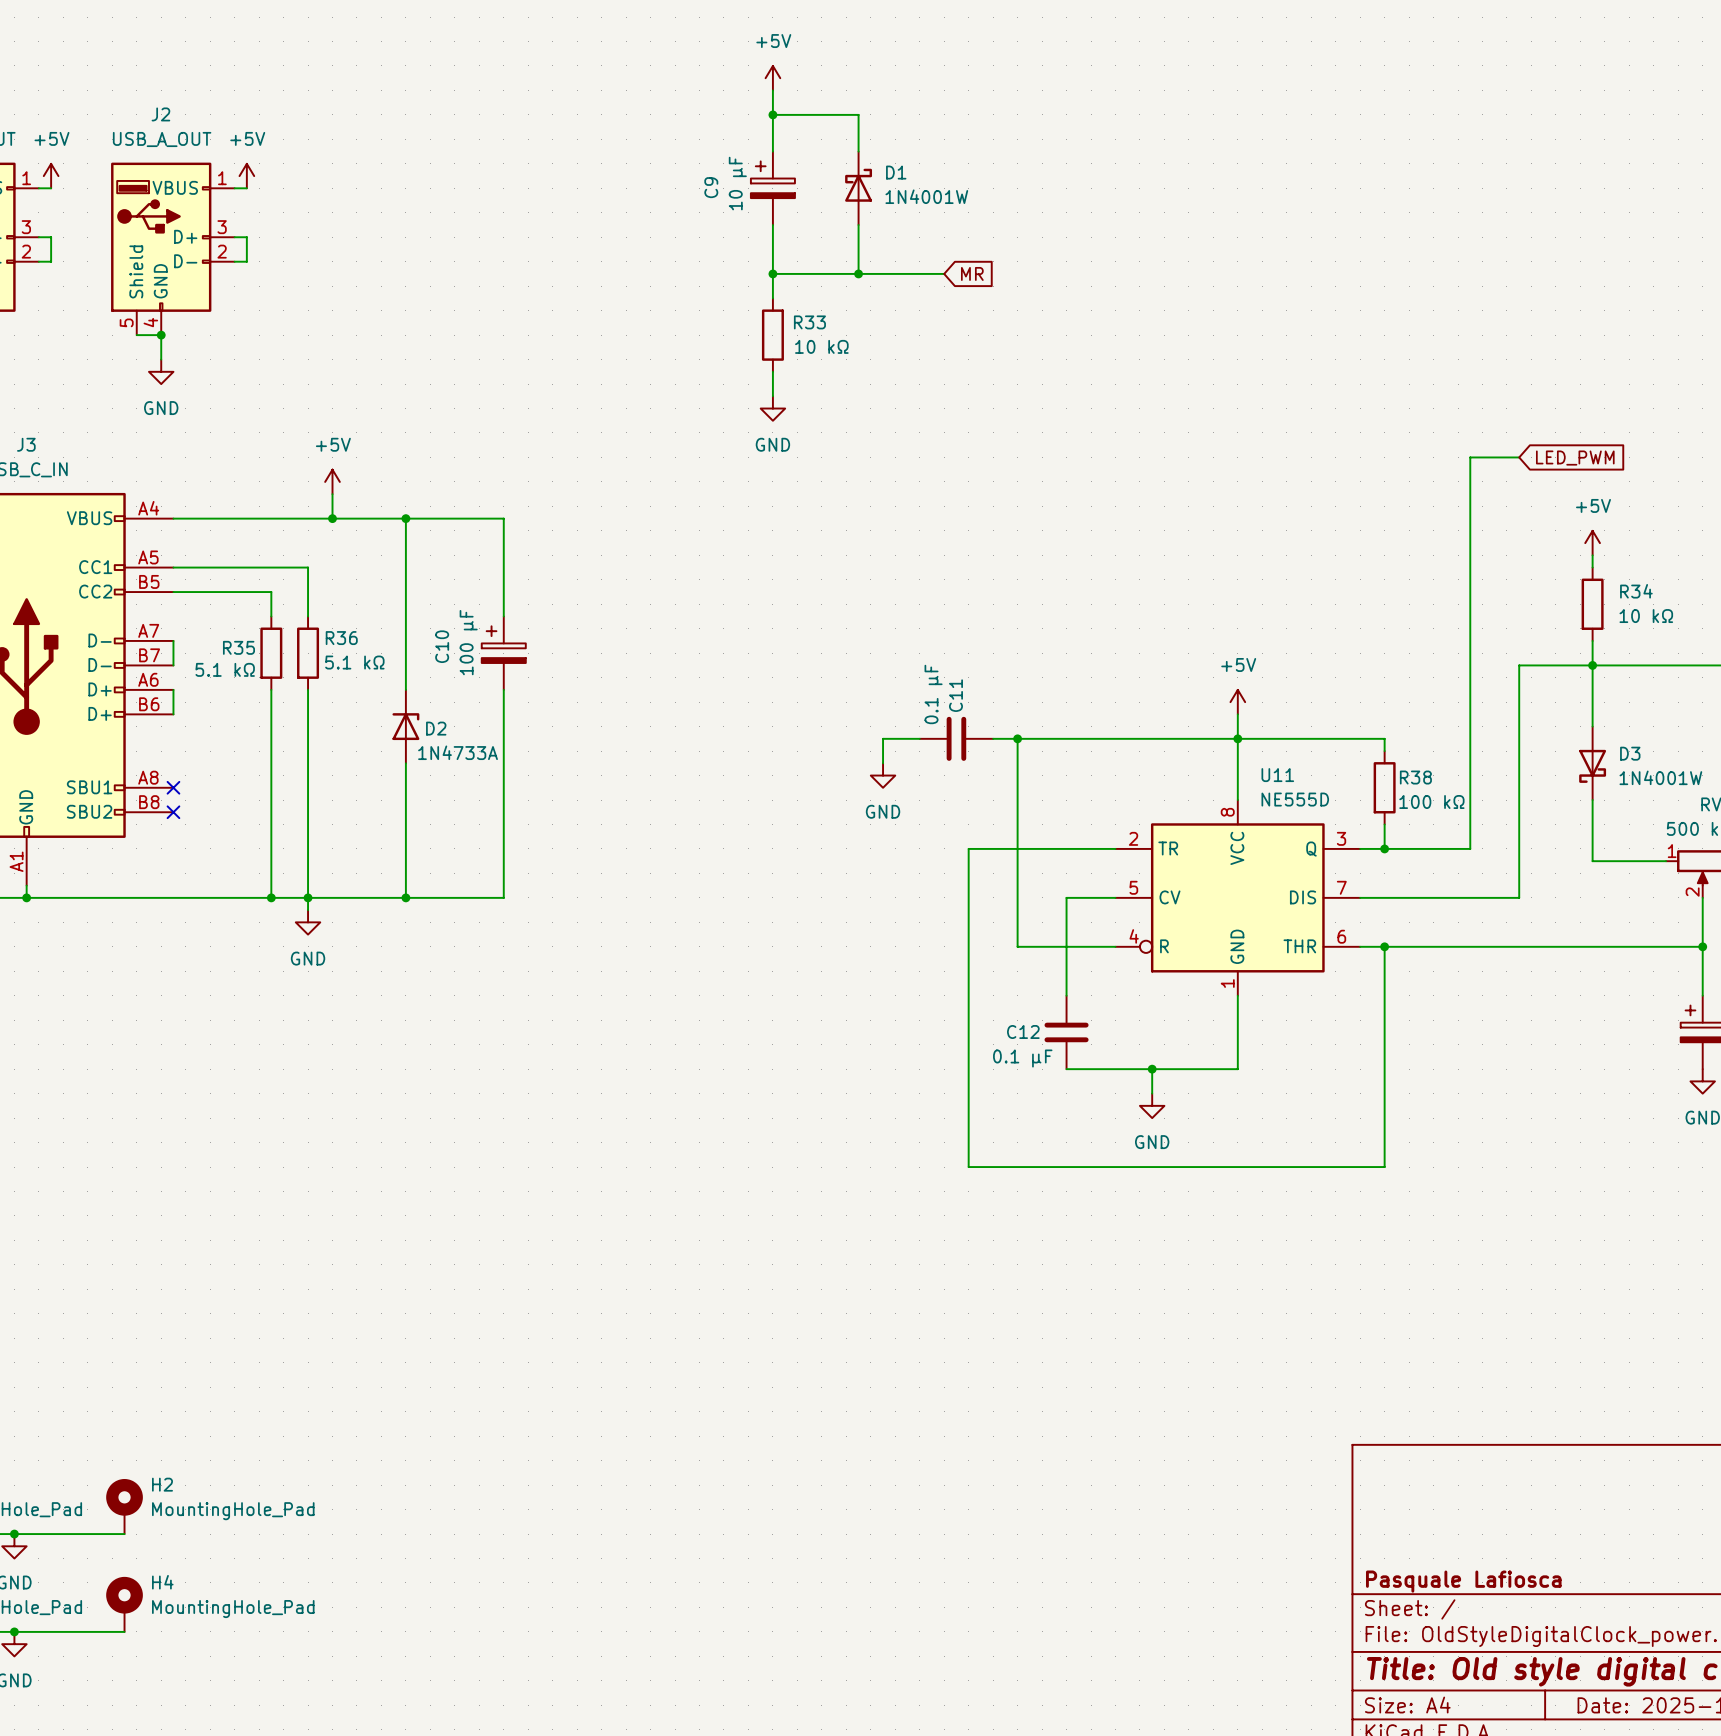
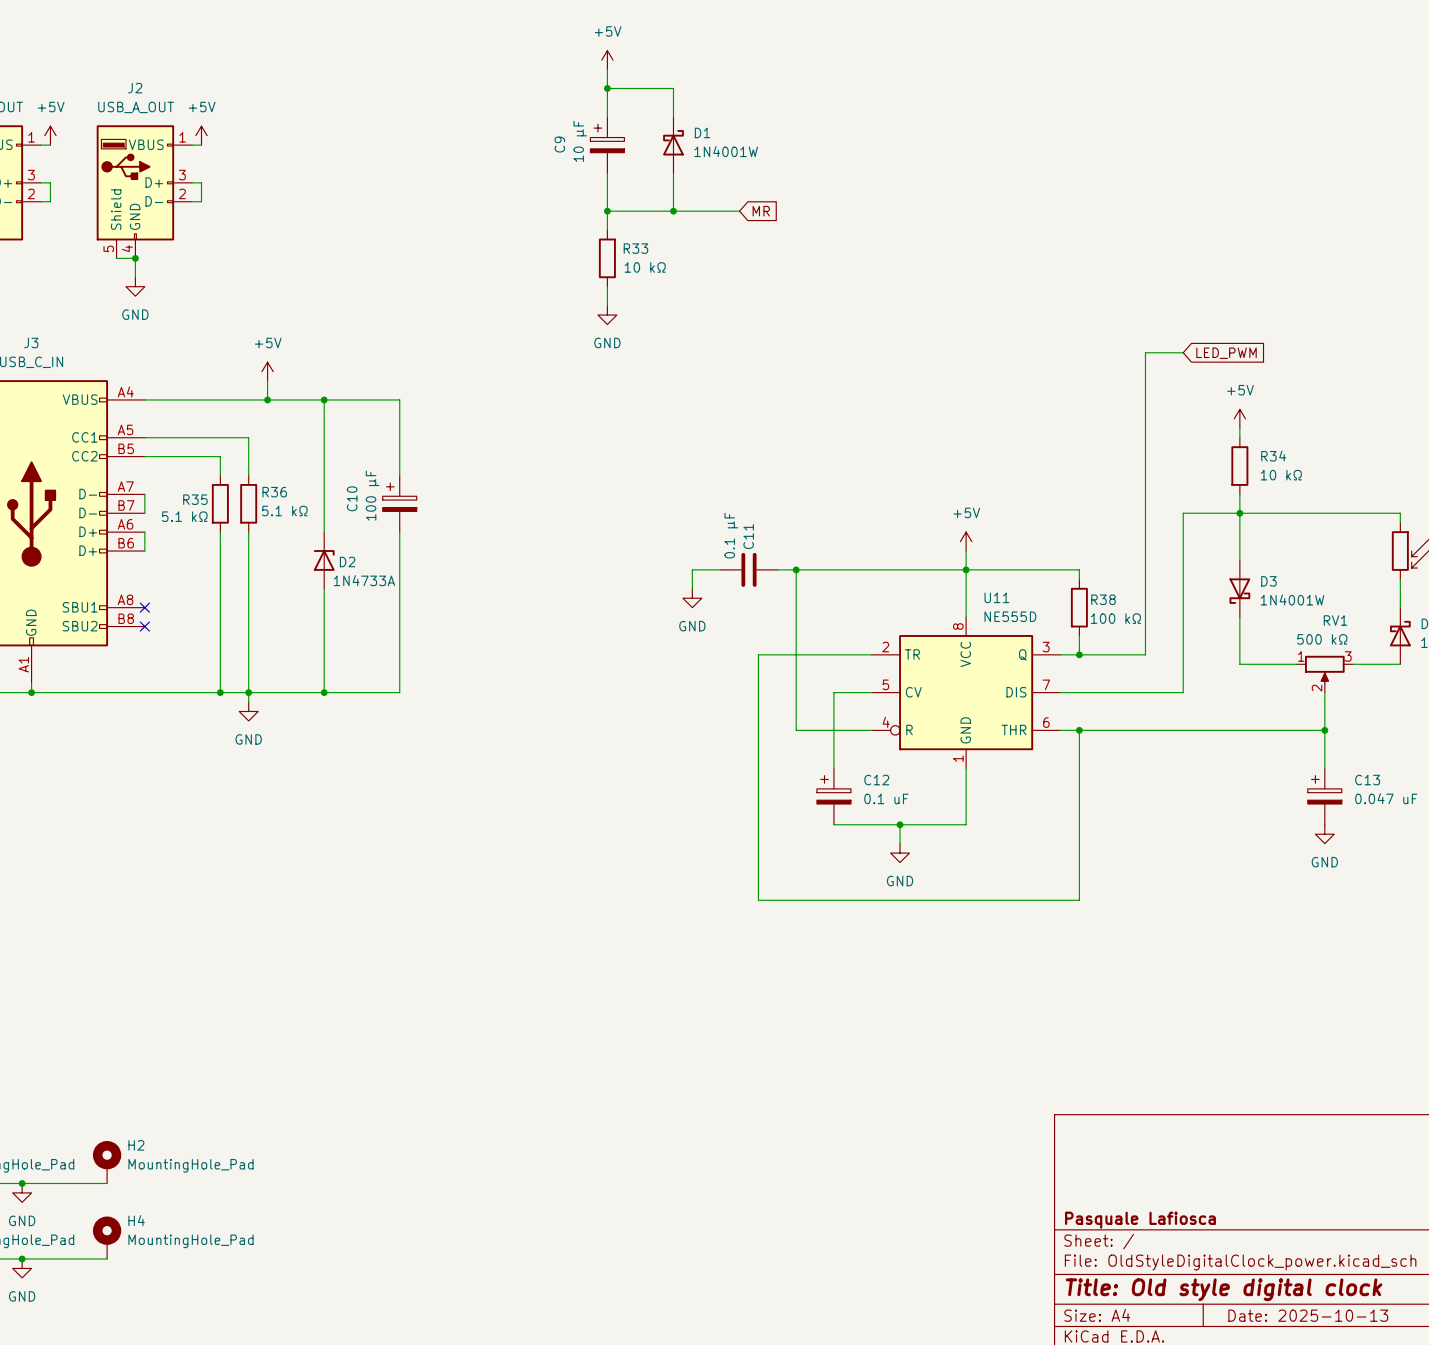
C12 symbol: [1044, 995, 1089, 1070] -> [816, 768, 851, 825]
C12 name position: C12 (1023, 1032) -> C12 (876, 780)
C12 value: 0.1 µF (1022, 1058) -> 0.1 uF (886, 798)

